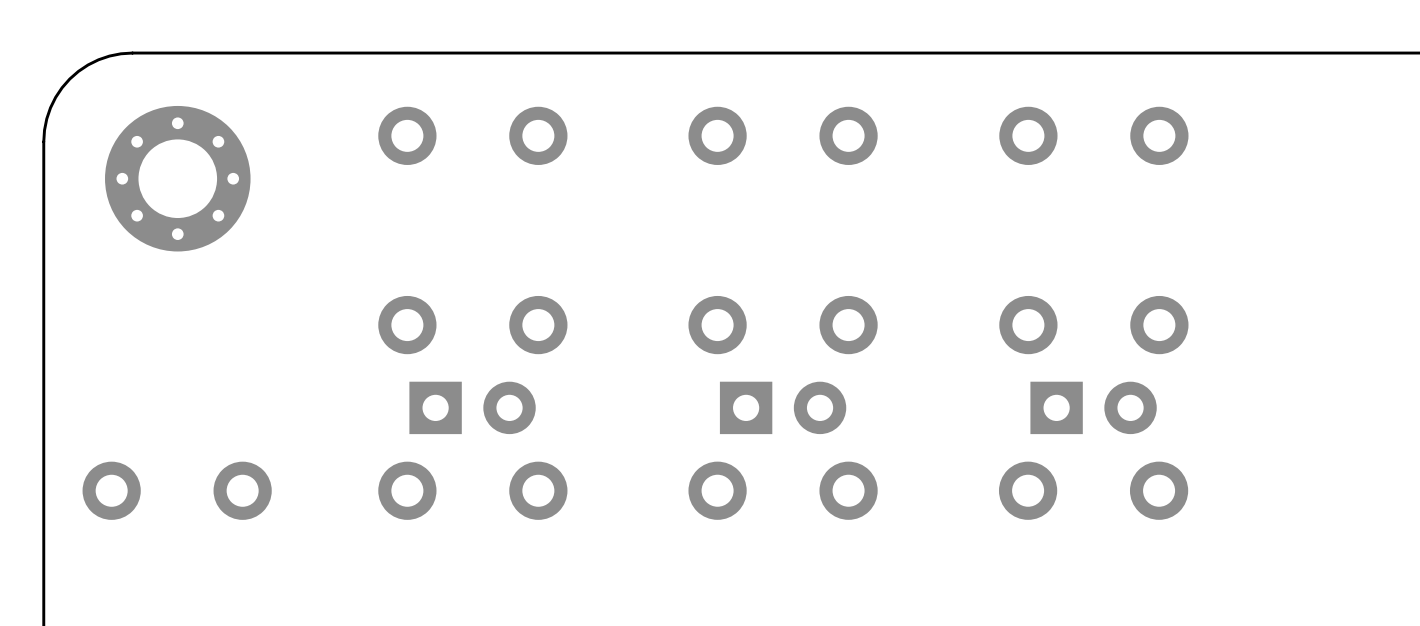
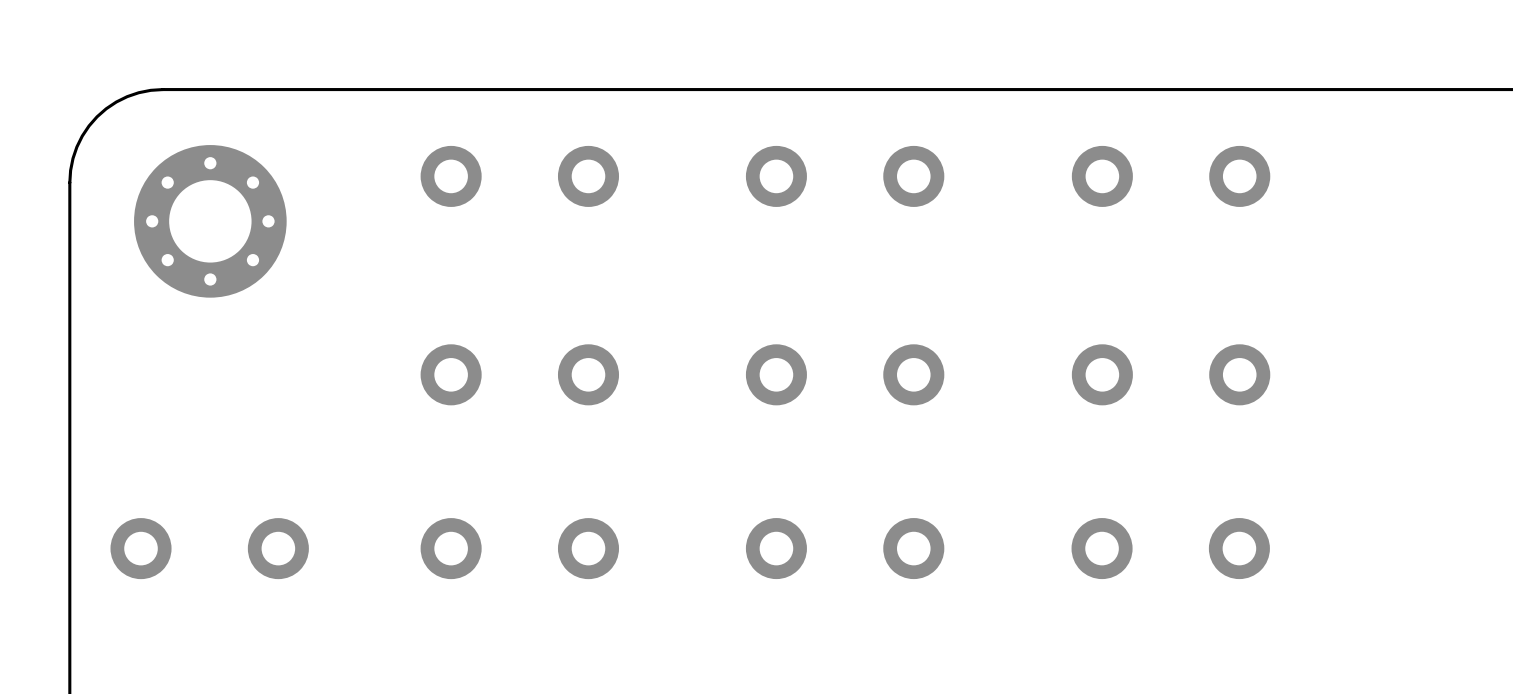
part: (472, 407) -> none
part: (783, 407) -> none
part: (1093, 407) -> none

